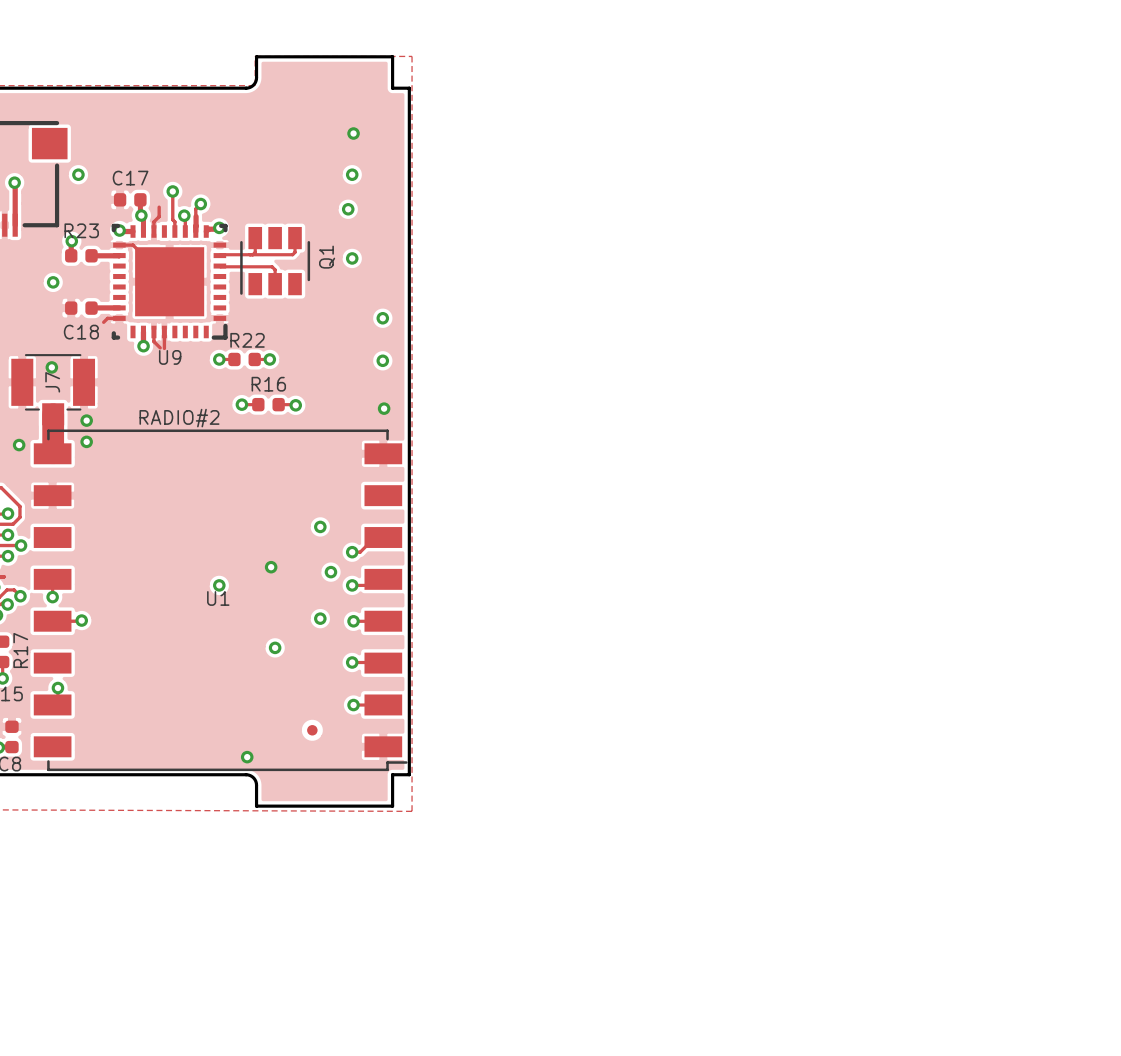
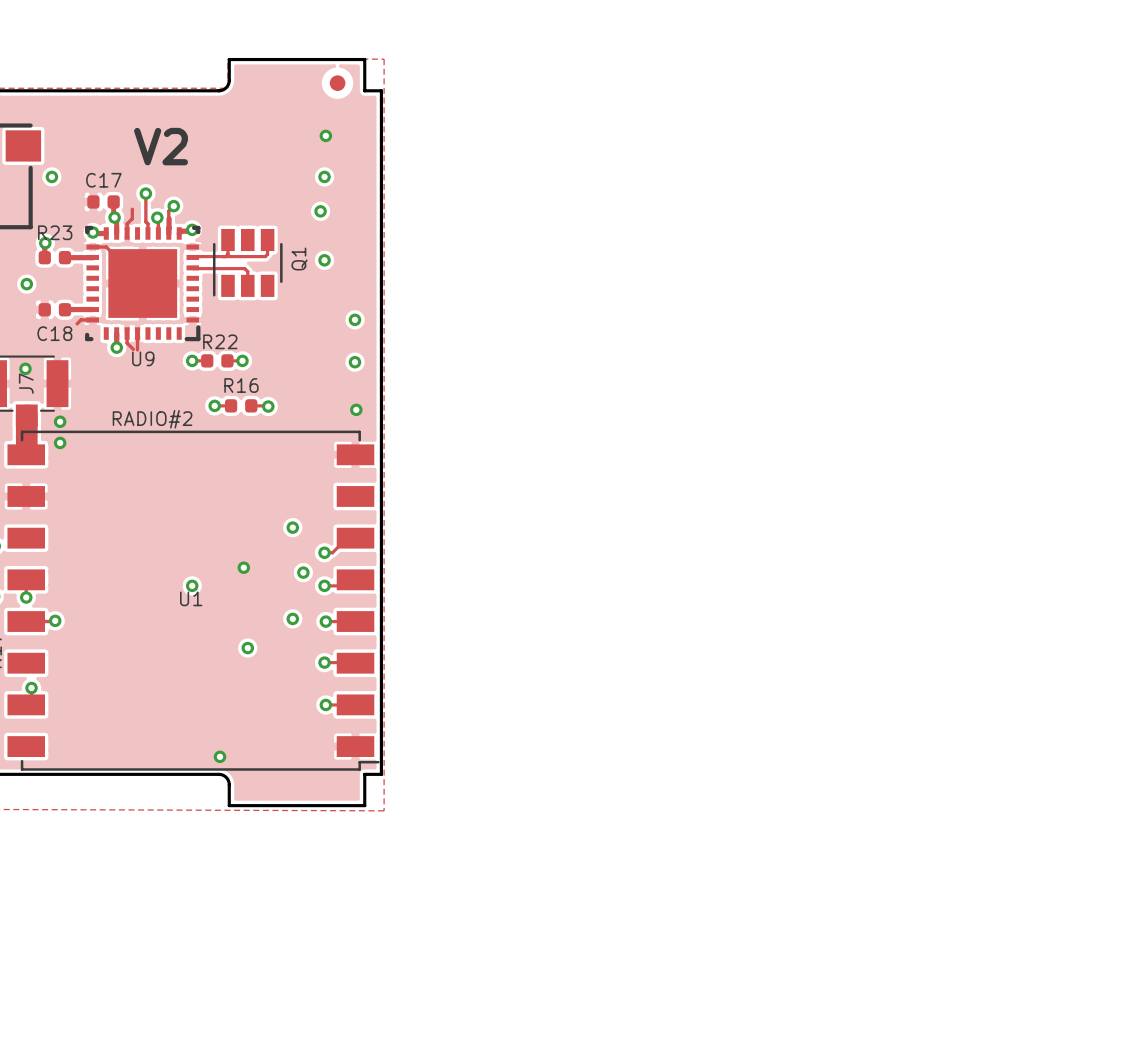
part: none -> (337, 83)
text: none -> V2 (161, 146)
part: (312, 730) -> none

